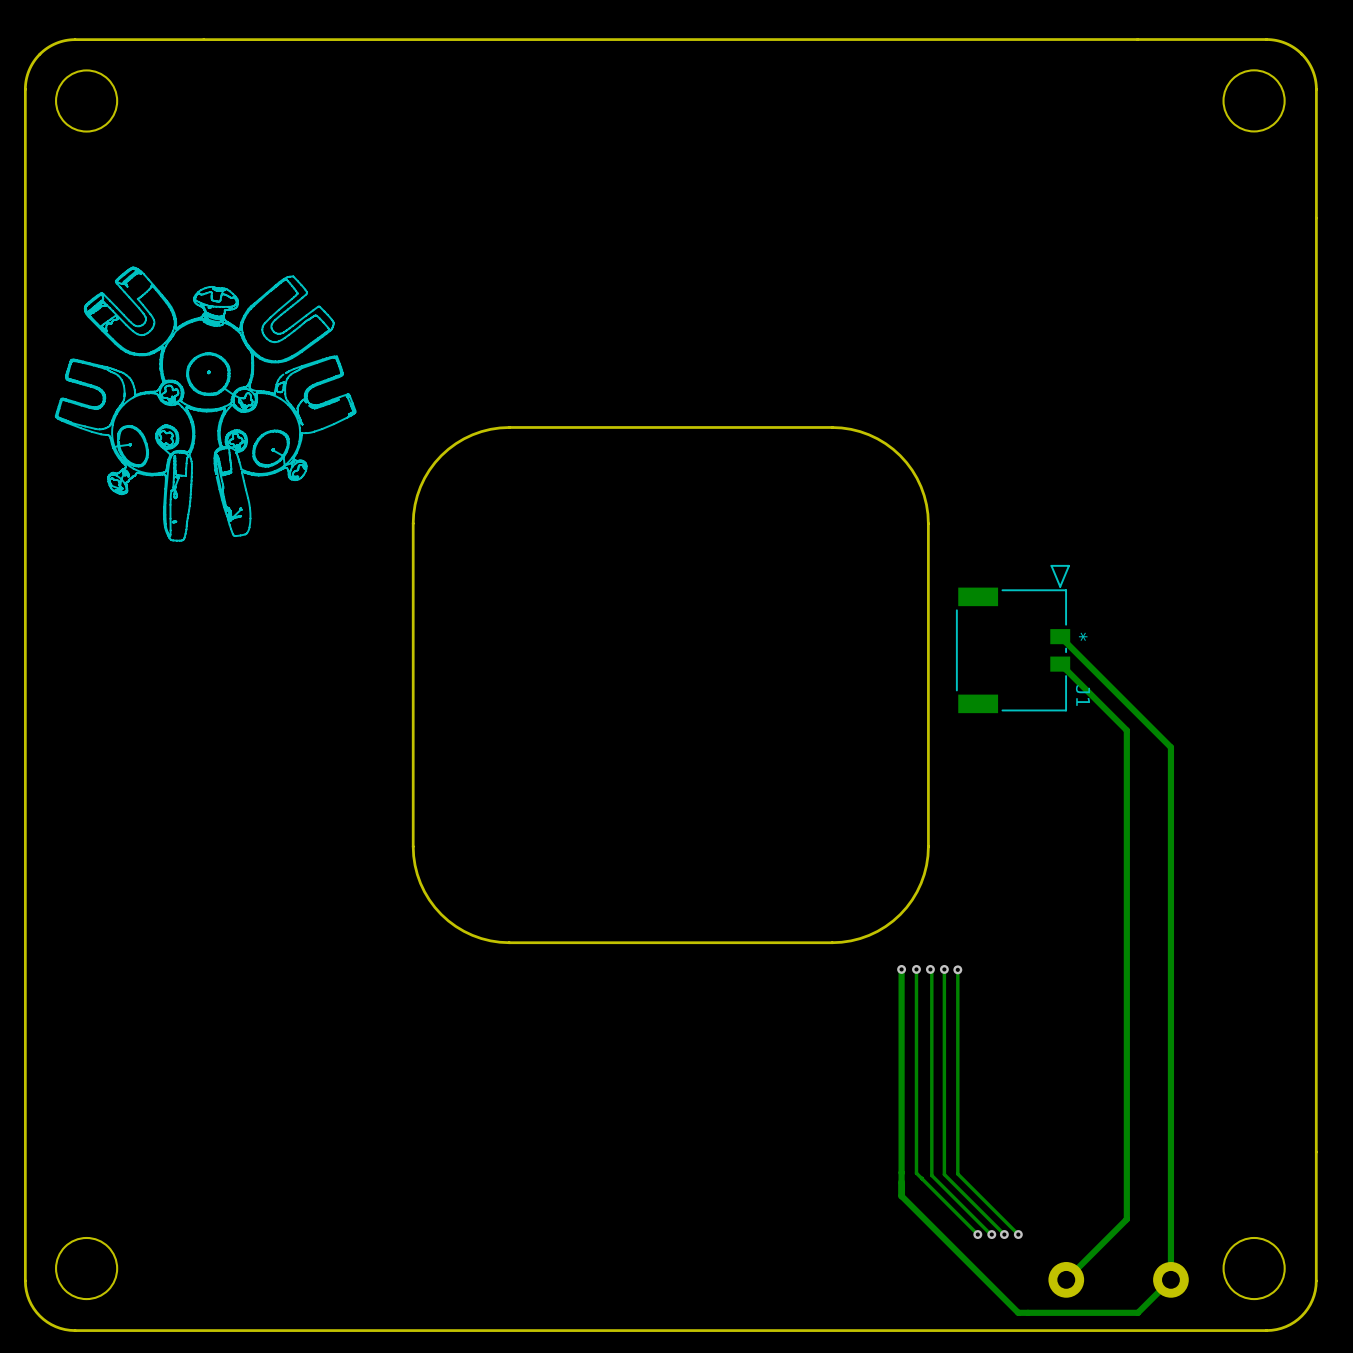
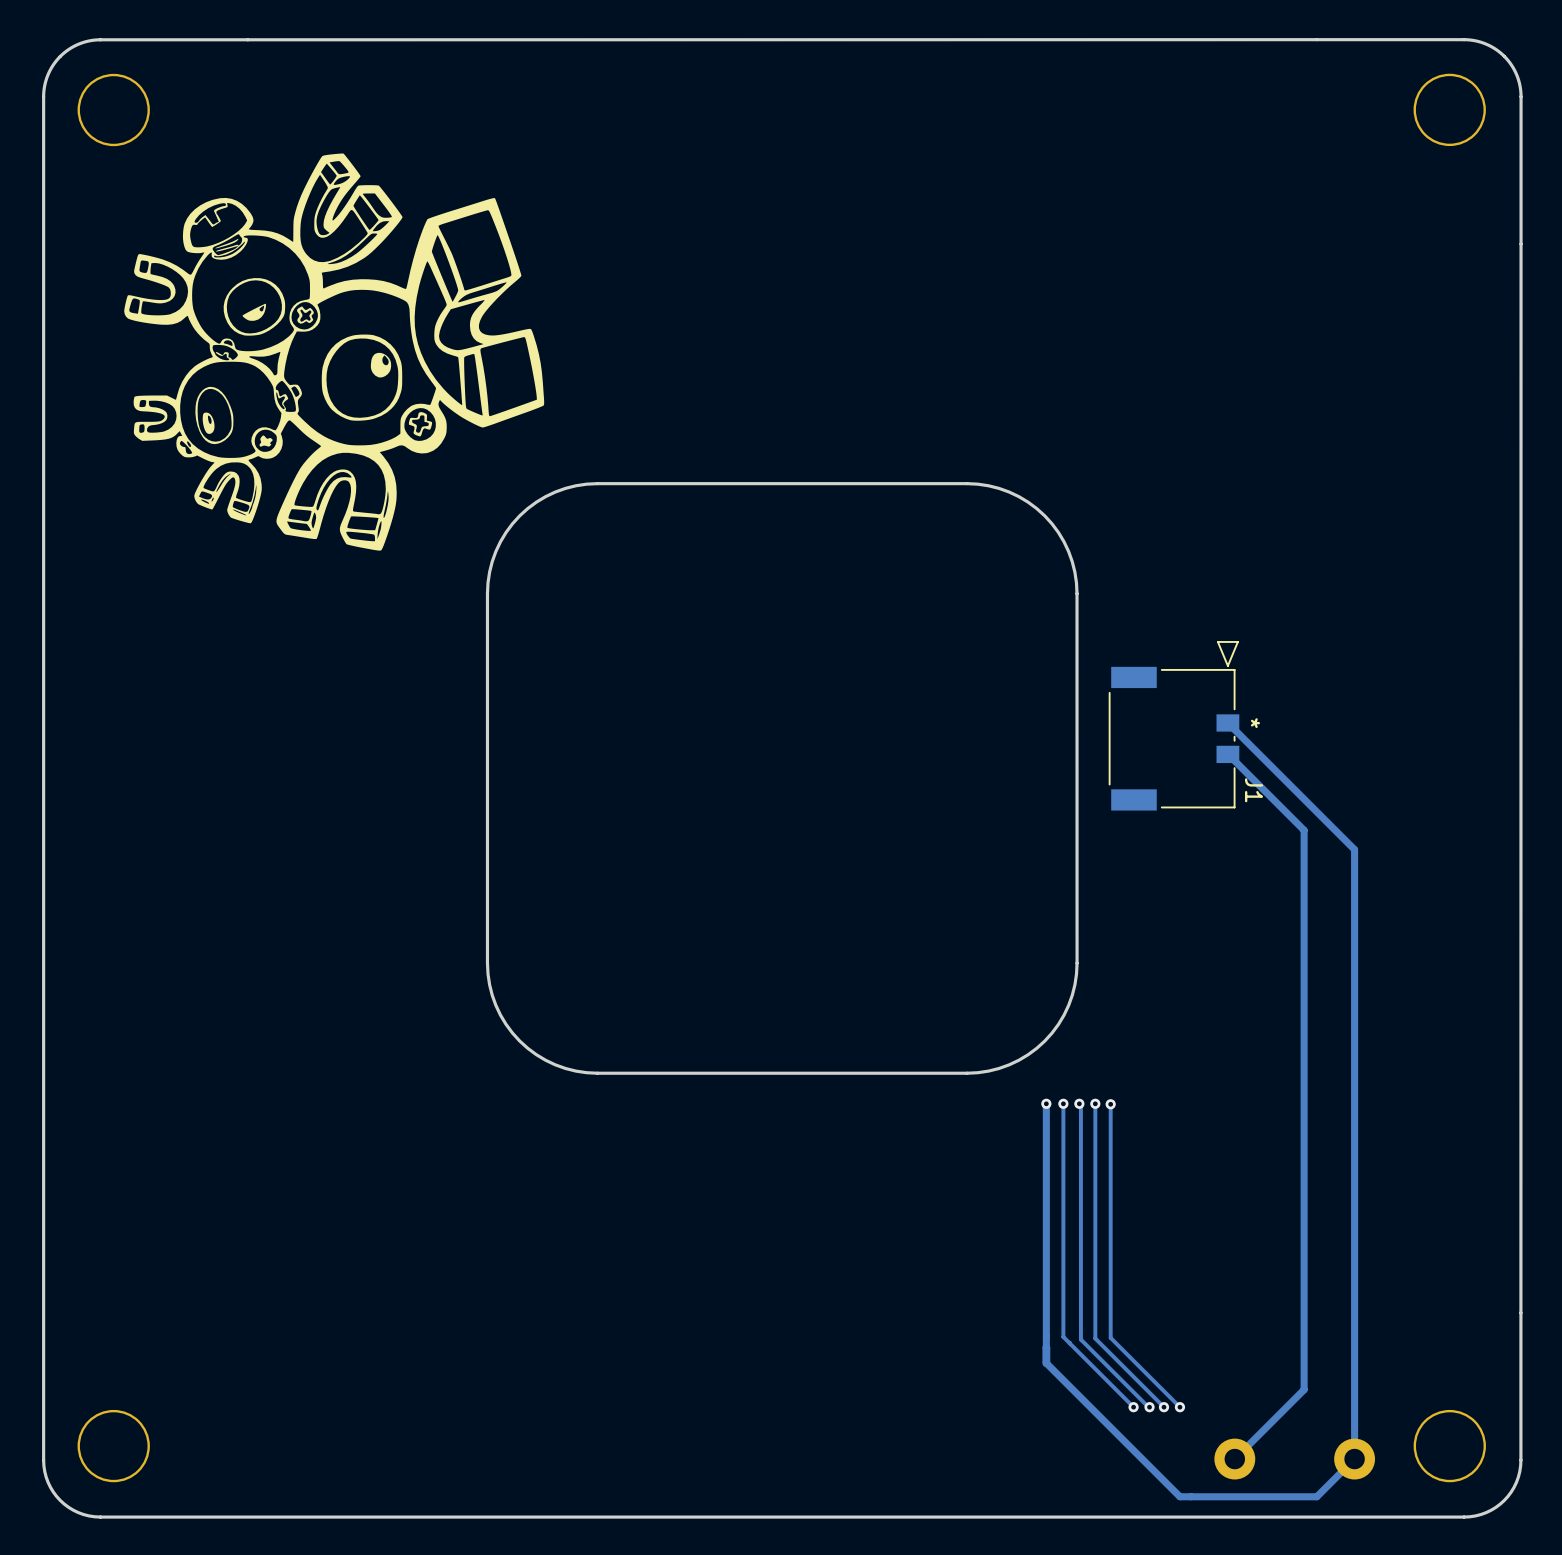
drawing: none -> [124, 153, 545, 551]
drawing: [55, 267, 356, 541] -> none

